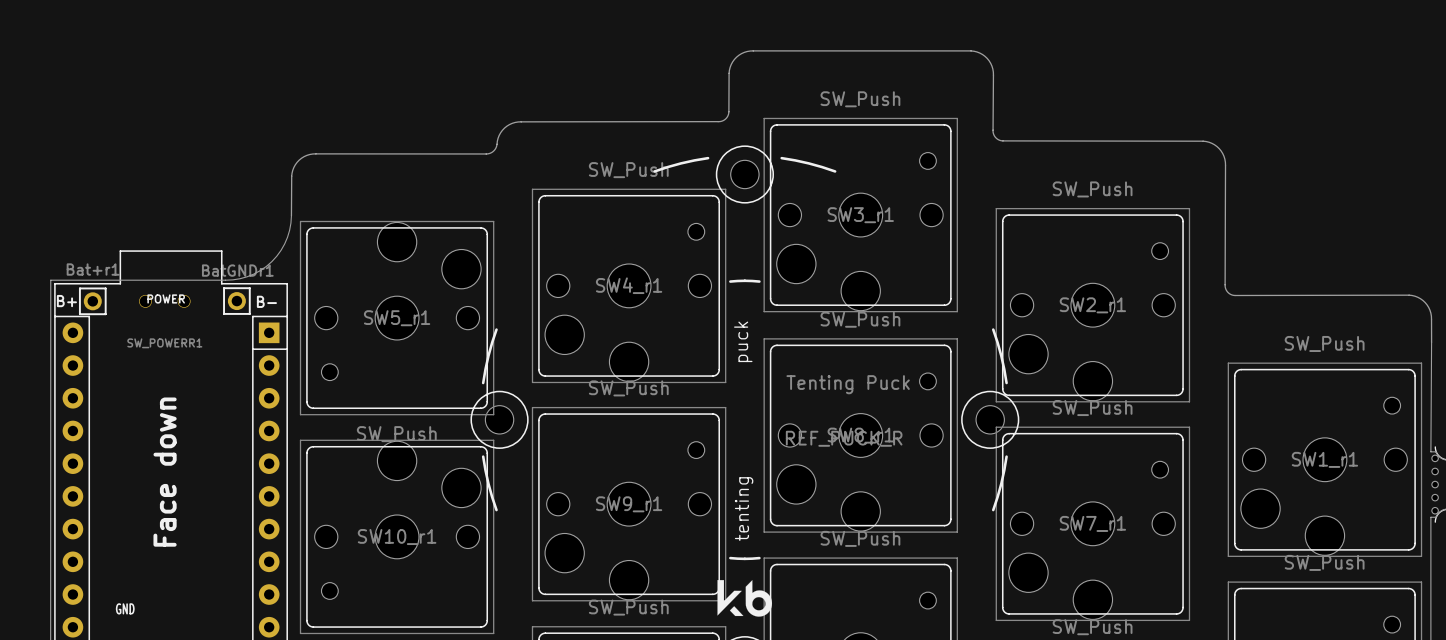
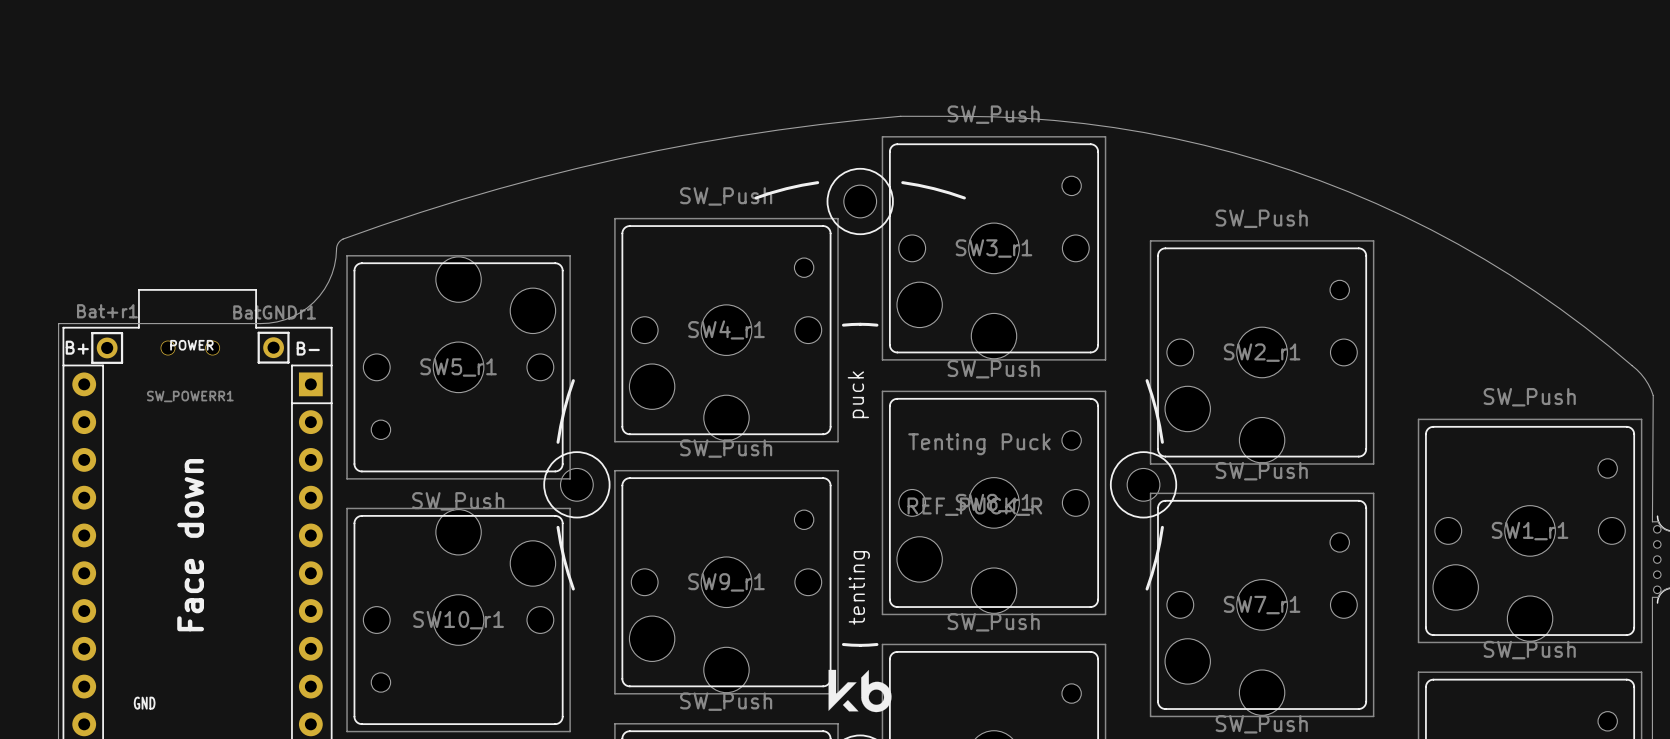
board edge: (291, 215) (292, 170) (299, 160) (309, 154) (487, 153) (495, 149) (499, 135) (504, 128) (518, 121) (721, 121) (726, 118) (728, 112) (729, 73) (731, 64) (738, 55) (750, 51) (971, 50) (984, 56) (991, 66) (993, 131) (994, 136) (999, 140) (1203, 141) (1216, 146) (1222, 153) (1225, 162) (1225, 285) (1229, 293) (1235, 295) (1412, 295) (1423, 300) (1429, 310) (1431, 342) -> (336, 249) (338, 243) (343, 239) (420, 212) (498, 188) (617, 159) (738, 136) (819, 124) (900, 116) (993, 116) (1084, 123) (1144, 132) (1233, 152) (1320, 180) (1403, 216) (1484, 259) (1560, 309) (1636, 369) (1644, 378) (1653, 395)

